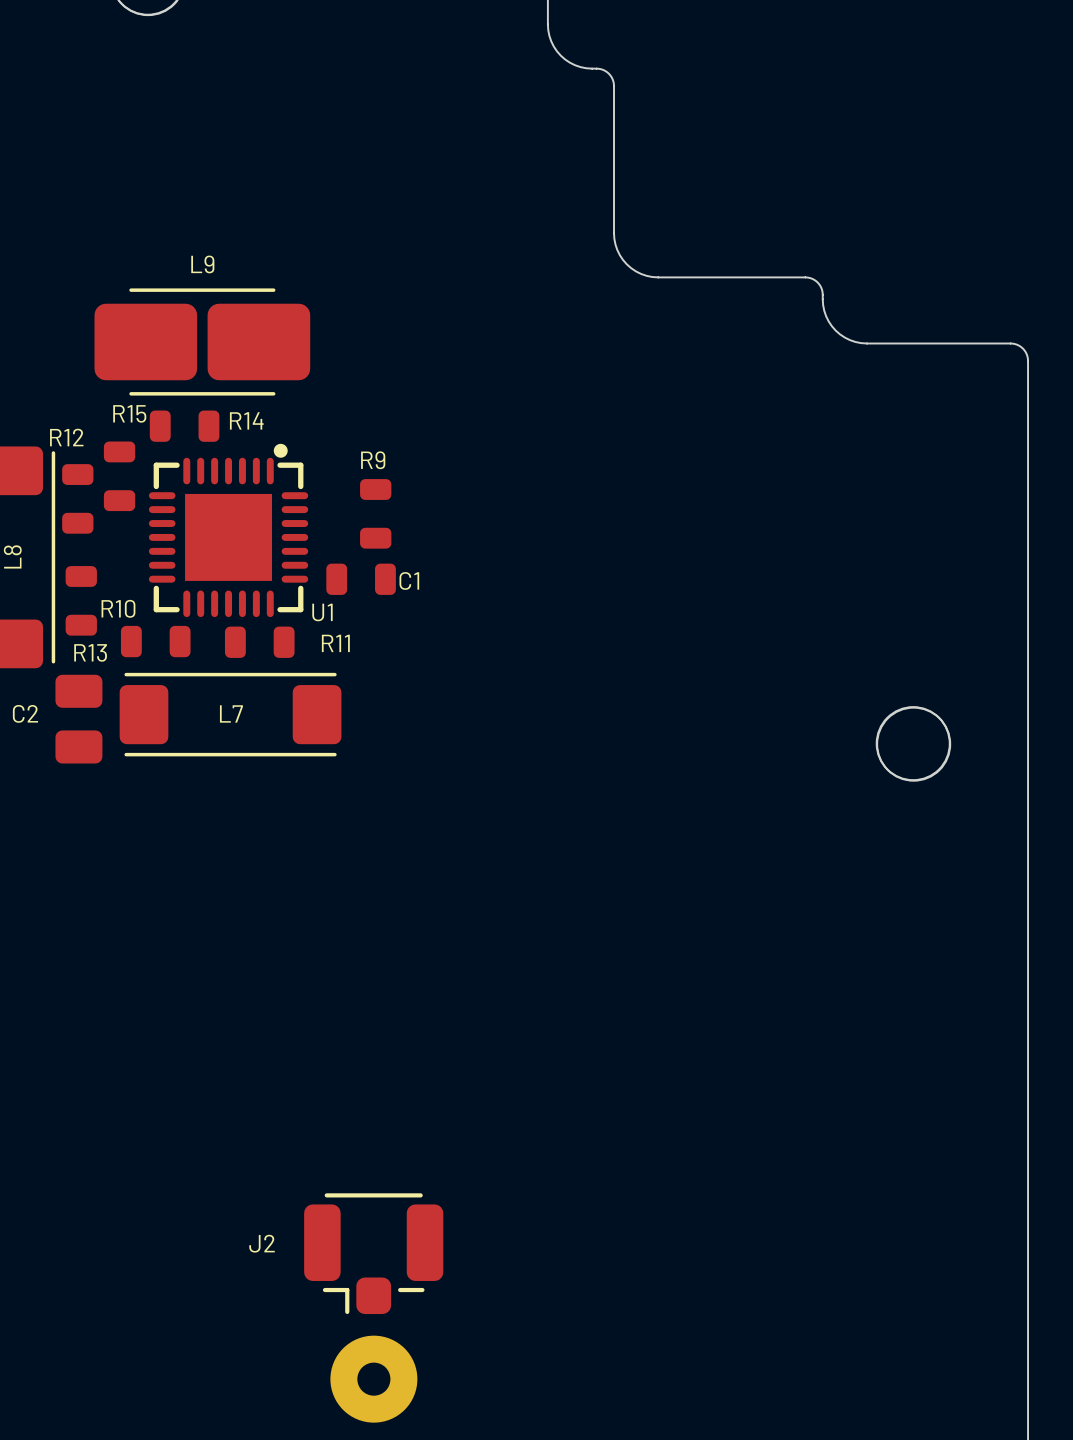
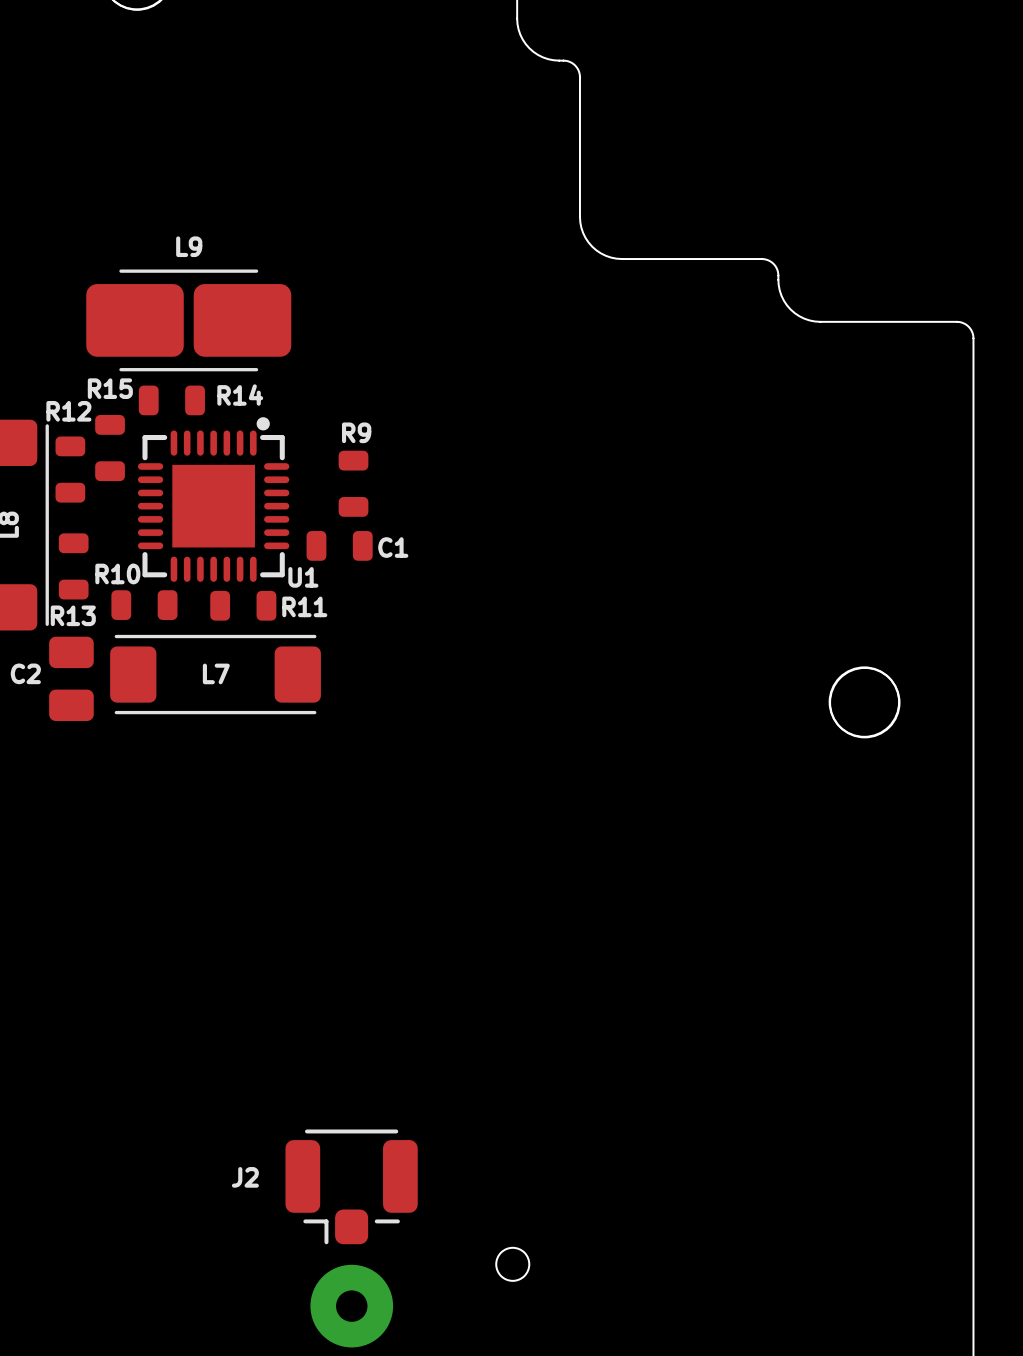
round board edge: none -> [495, 1247, 530, 1282]

